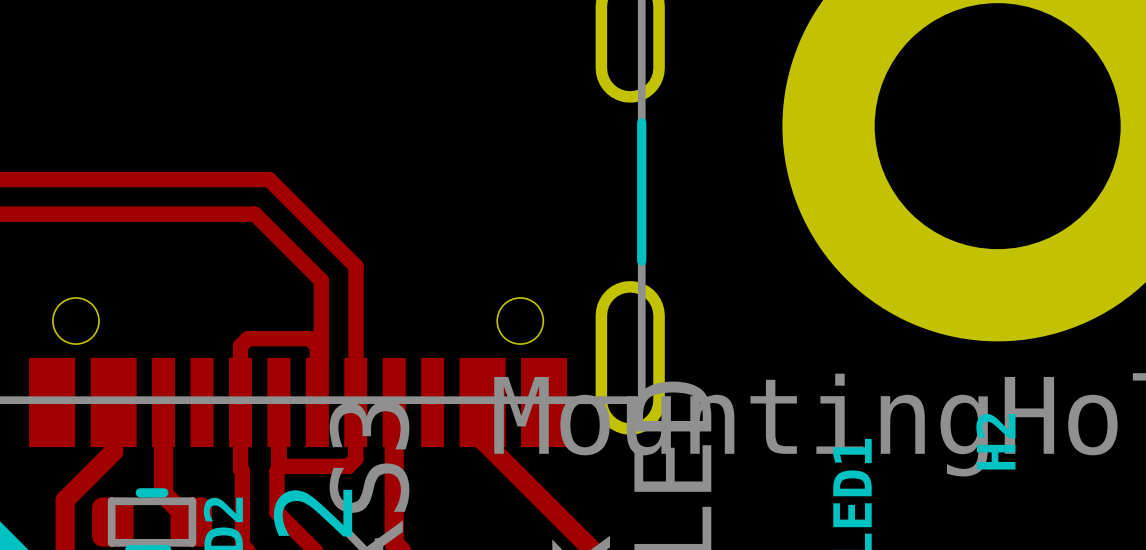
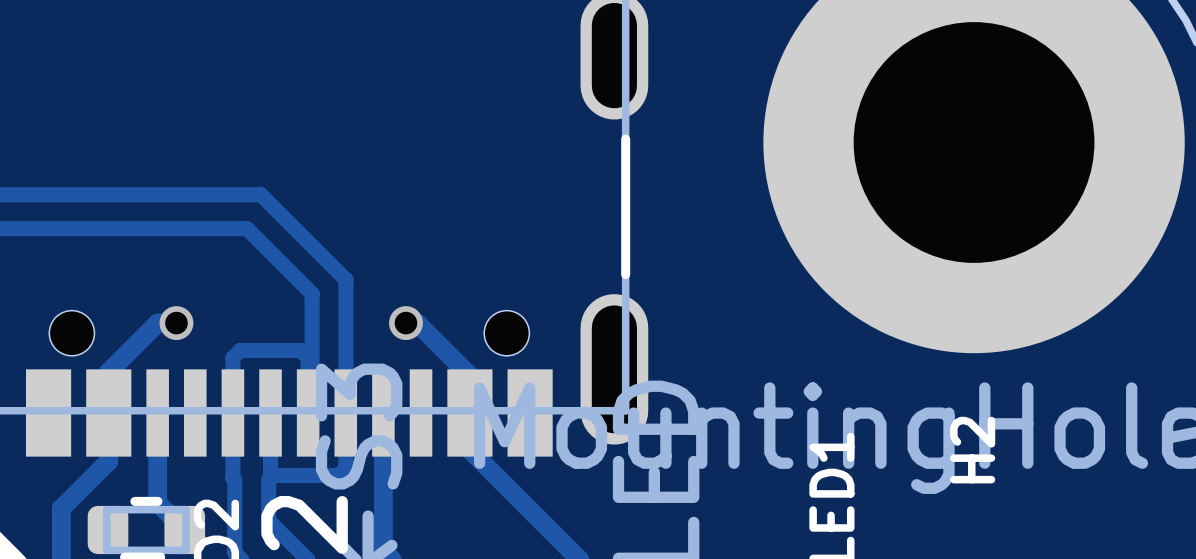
track: none -> (176, 323) (157, 323) (108, 371) (108, 412)
via: none -> (176, 323)
track: none -> (405, 323) (417, 323) (469, 375) (469, 412)
via: none -> (405, 323)

